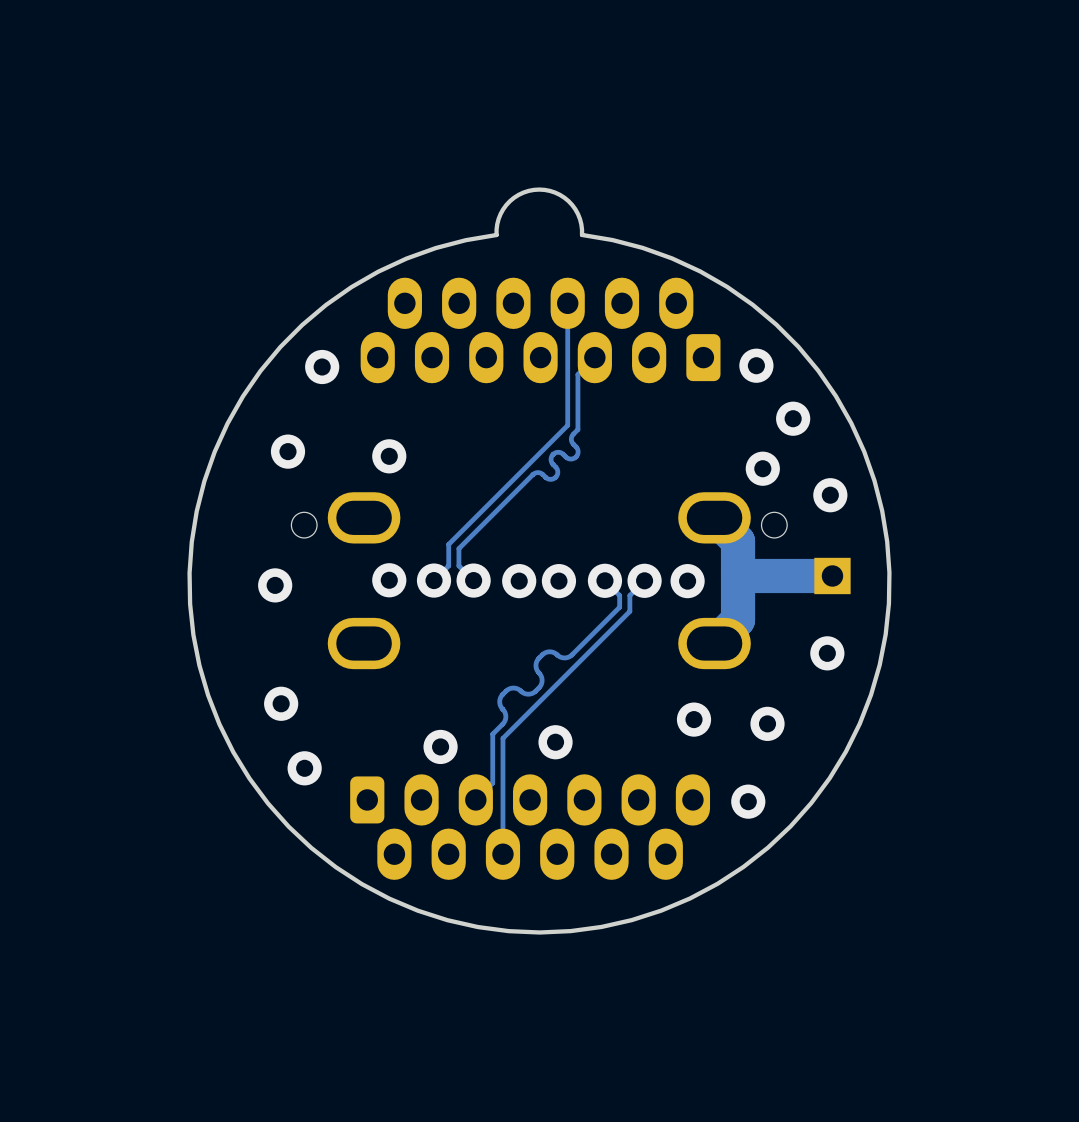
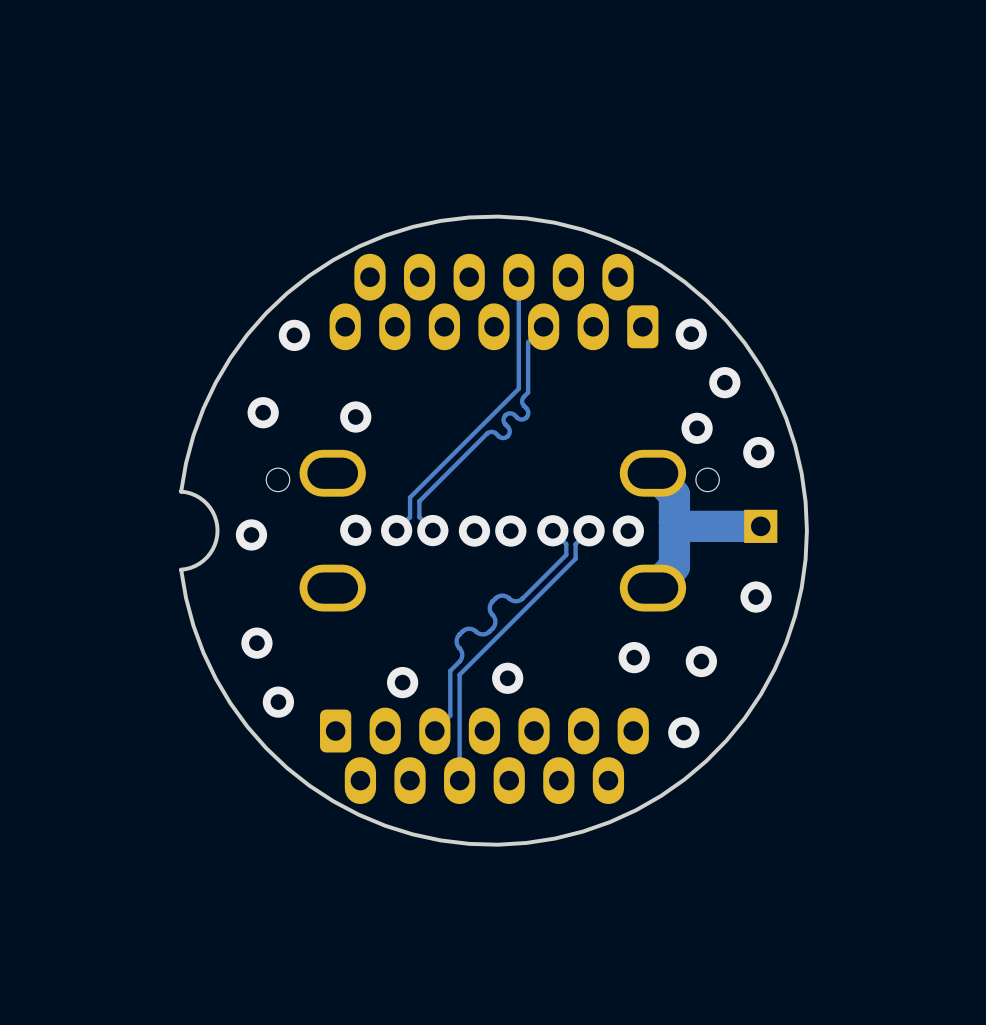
board edge: (582, 234) (579, 219) (568, 201) (549, 190) (528, 190) (518, 194) (506, 205) (498, 219) (496, 234) (435, 248) (406, 258) (378, 271) (326, 304) (280, 347) (260, 370) (227, 423) (204, 481) (191, 541) (190, 604) (199, 665) (219, 724) (249, 778) (268, 803) (311, 847) (361, 884) (417, 910) (477, 927) (508, 931) (570, 931) (631, 920) (690, 898) (743, 866) (790, 826) (829, 778) (845, 751) (871, 694) (885, 634) (889, 572) (882, 510) (874, 480) (851, 423) (818, 370) (776, 324) (752, 304) (700, 271) (642, 247) (582, 234) -> (181, 491) (193, 435) (215, 382) (247, 334) (286, 293) (333, 259) (358, 246) (412, 226) (469, 217) (526, 218) (582, 229) (636, 251) (684, 281) (726, 320) (760, 366) (786, 418) (801, 473) (805, 501) (805, 559) (795, 615) (774, 669) (744, 718) (726, 740) (684, 779) (636, 810) (582, 831) (526, 842) (469, 843) (412, 834) (358, 814) (333, 801) (286, 767) (247, 726) (215, 678) (203, 652) (193, 625) (181, 569) (199, 563) (210, 553) (216, 540) (216, 520) (212, 511) (203, 500) (195, 495) (181, 491)

